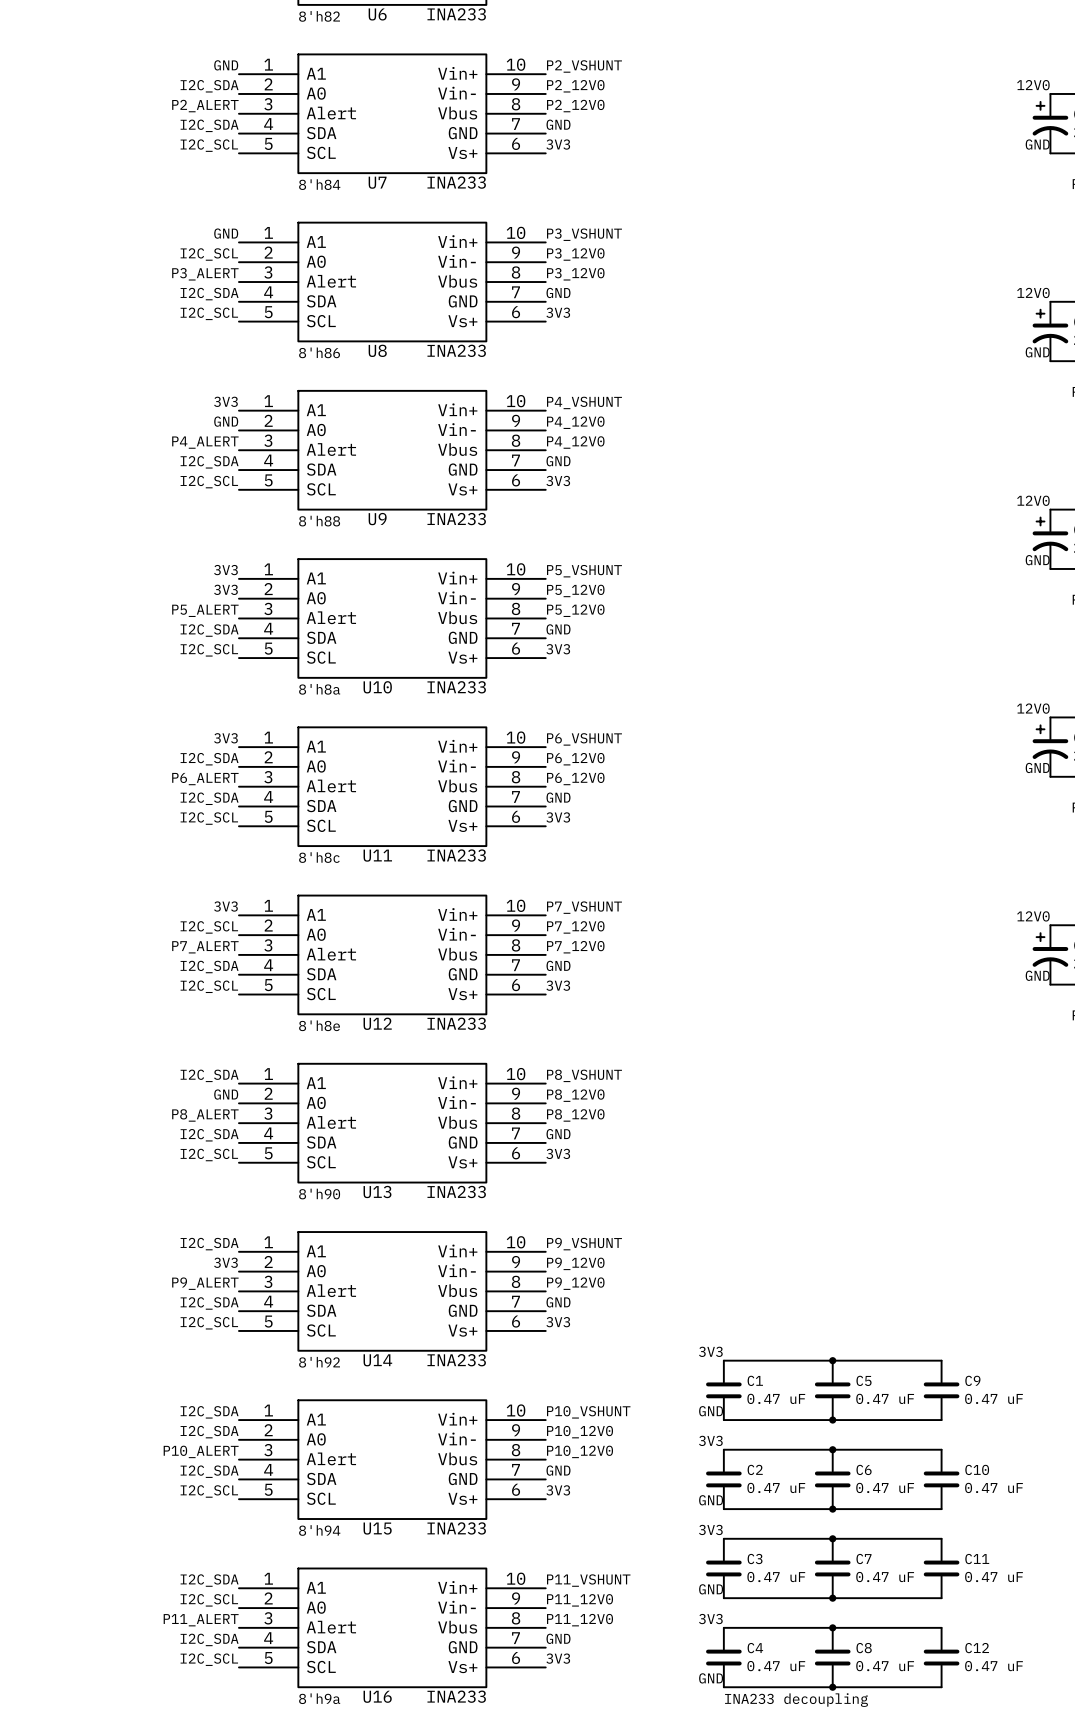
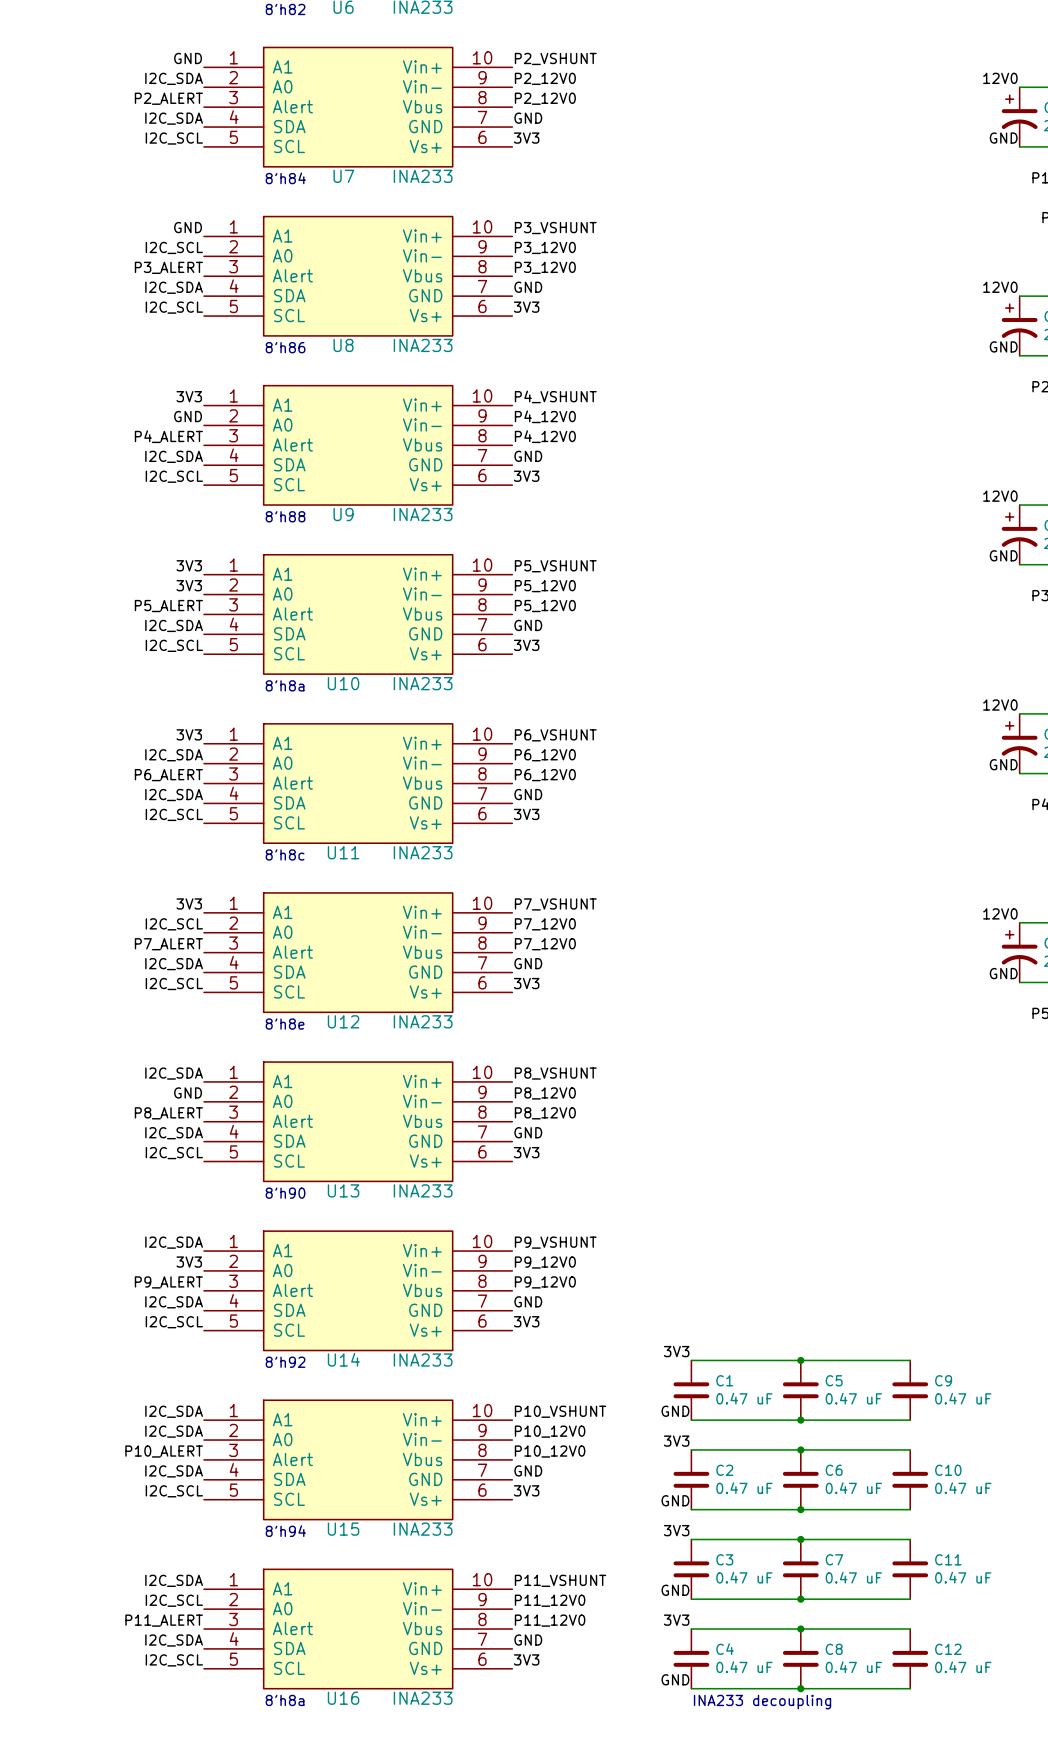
text: 8'h9a (319, 1698) -> 8'h8a (285, 1700)

